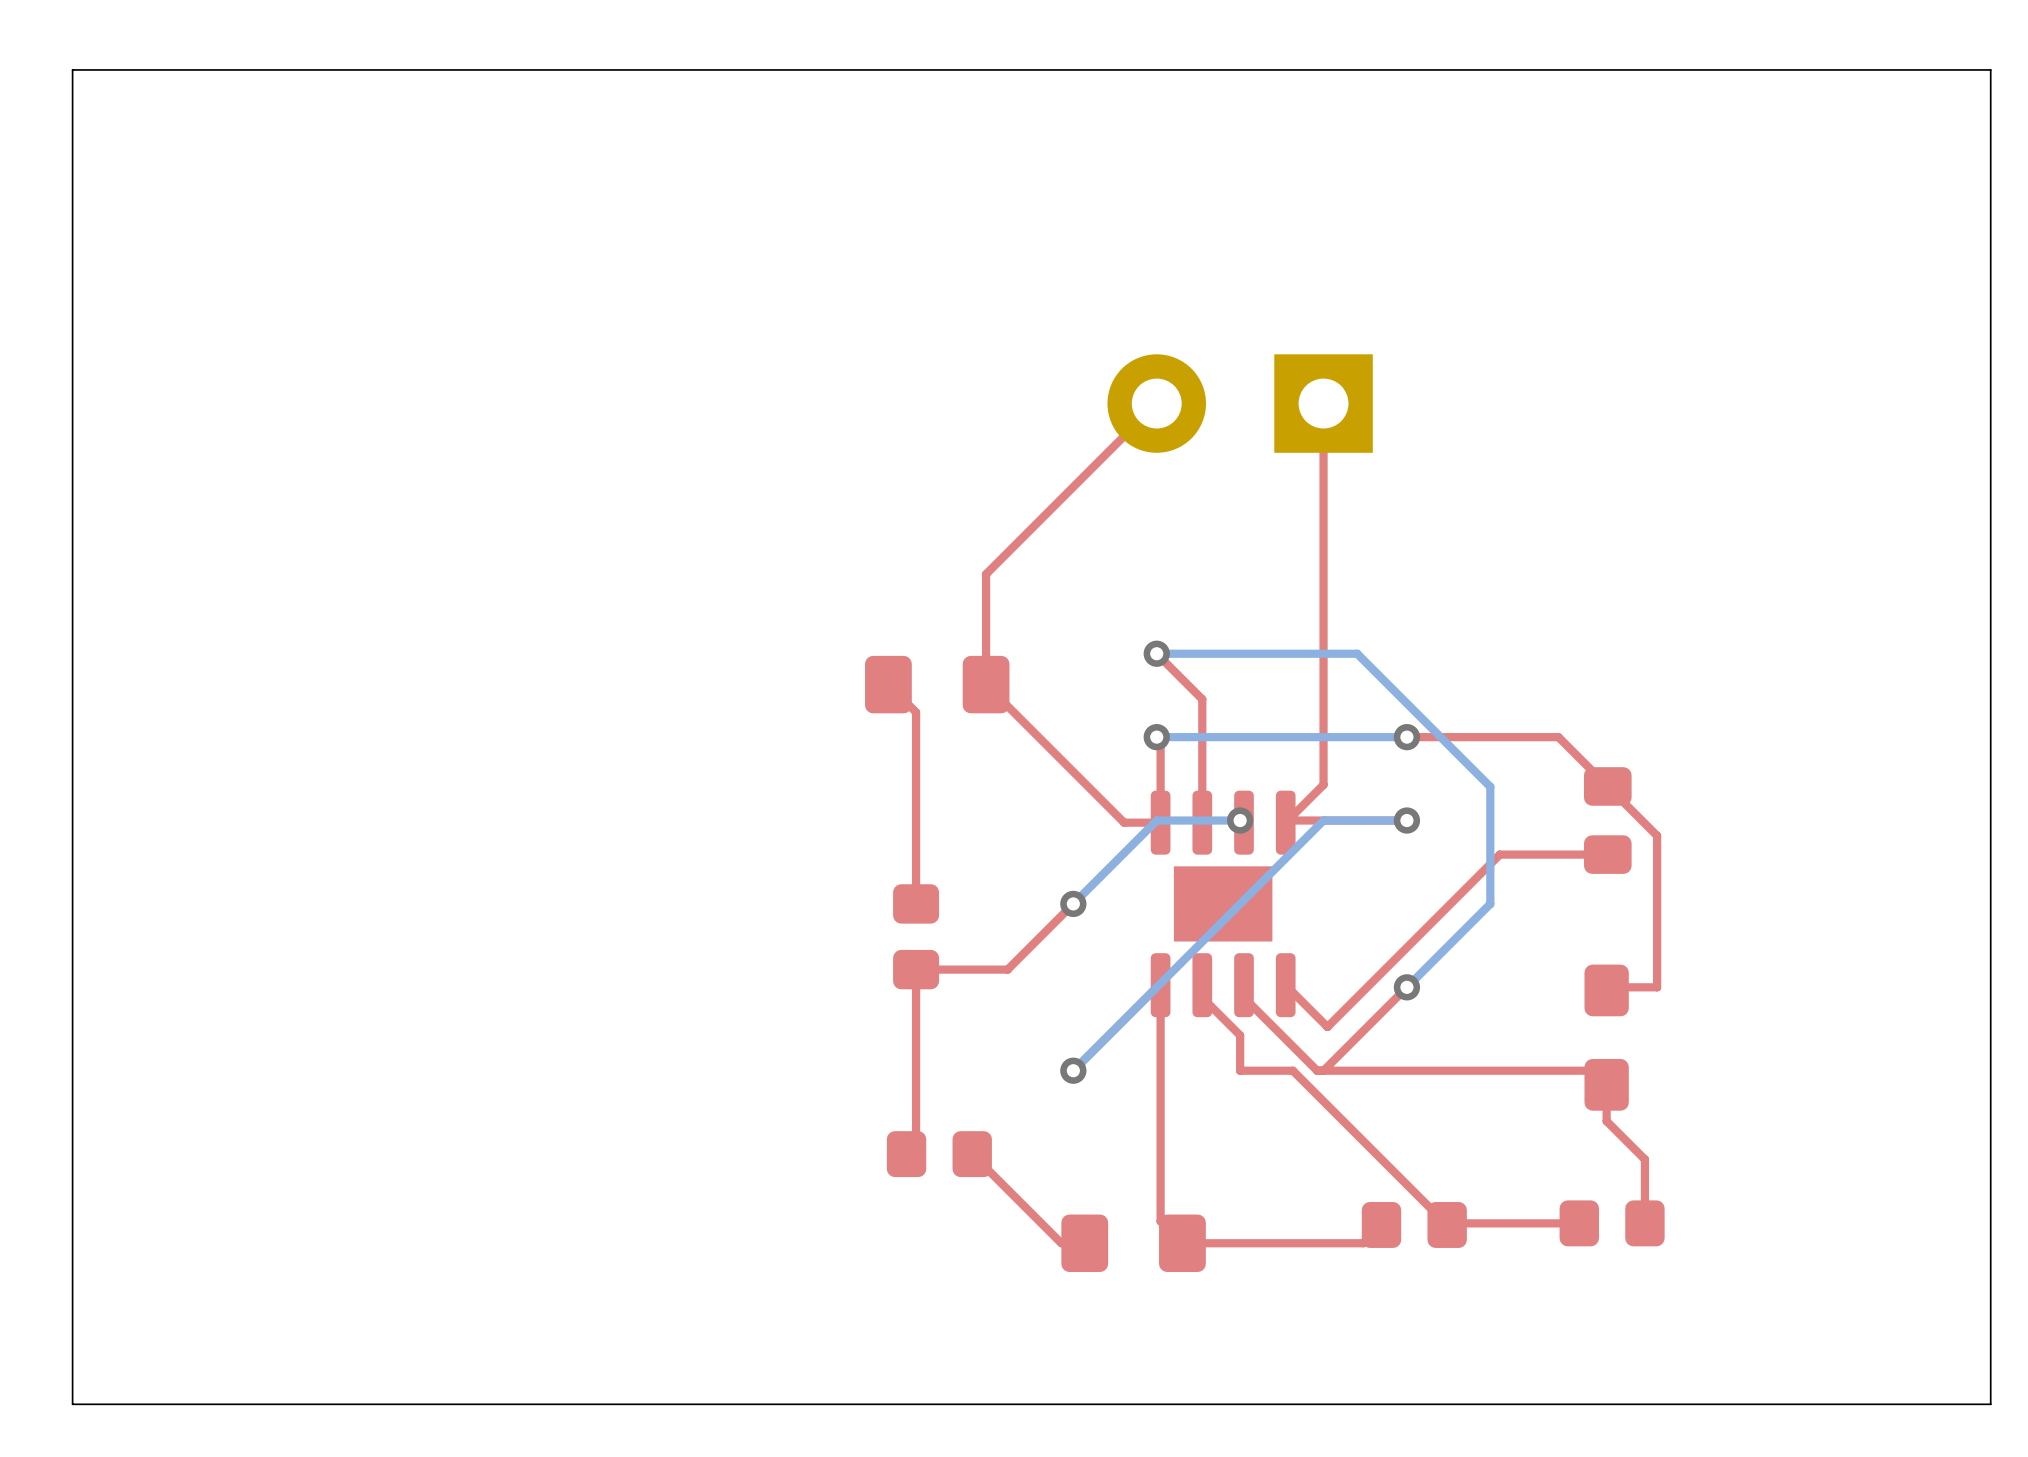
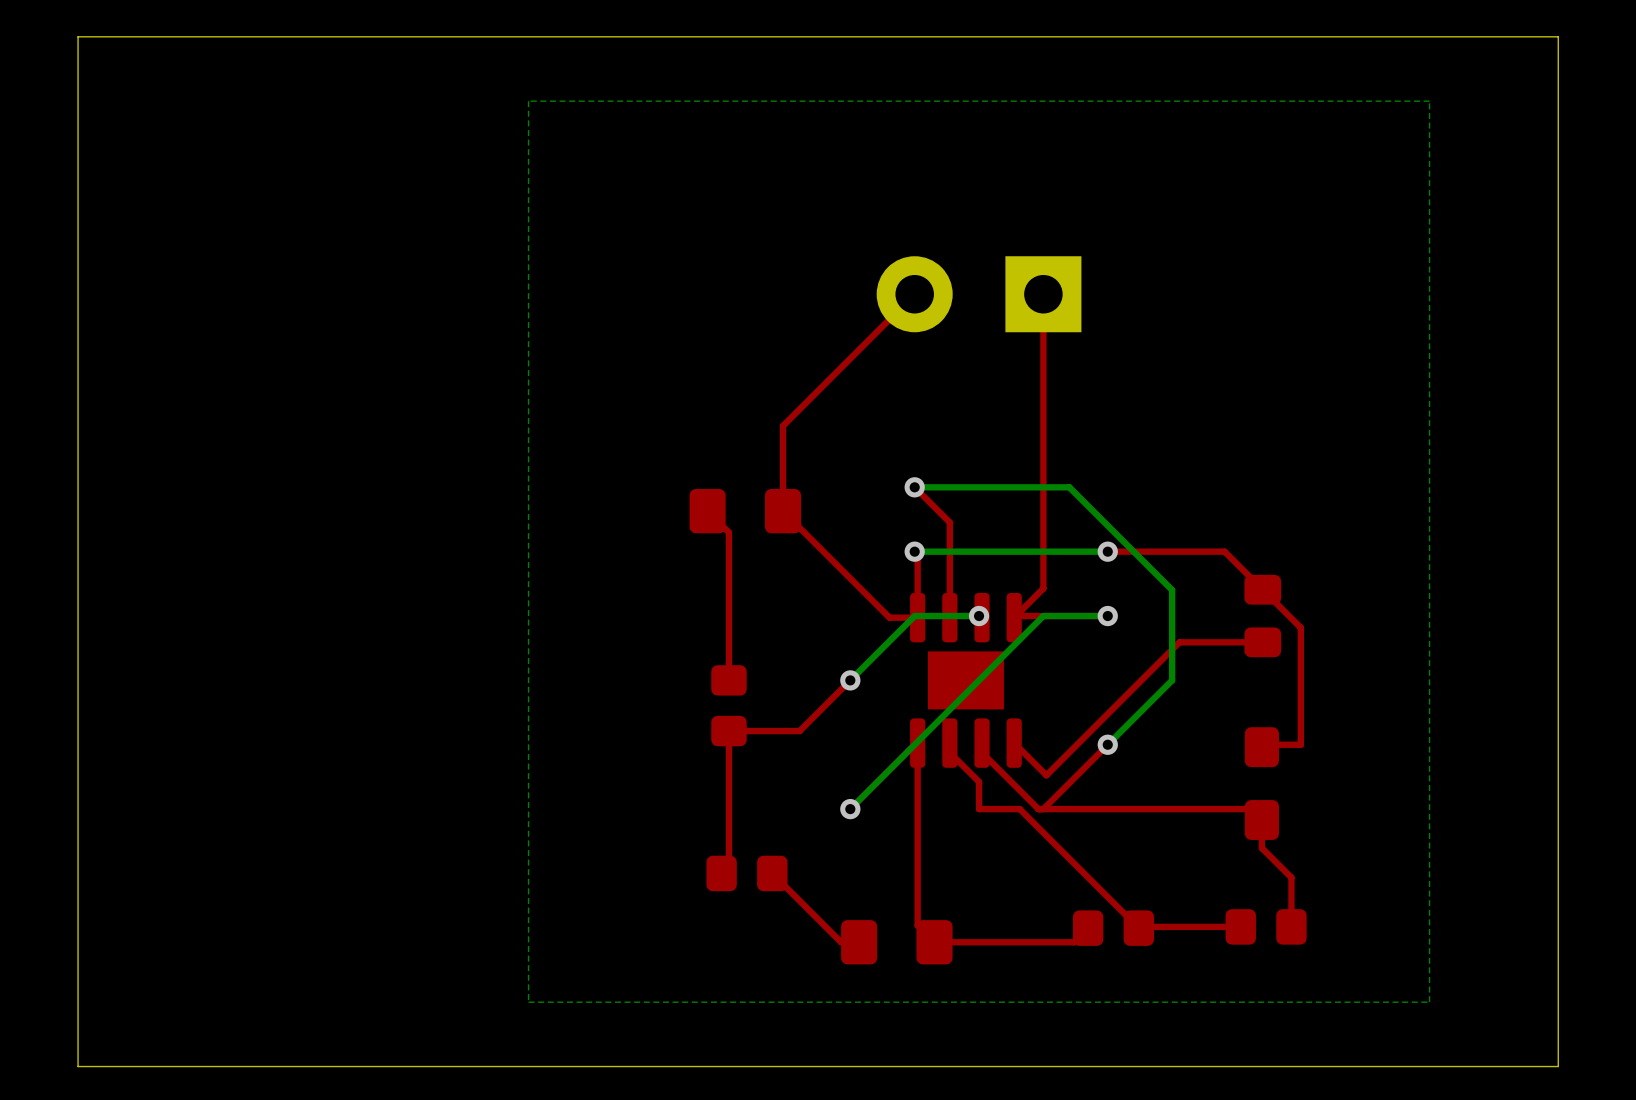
bottom zone outline: none -> (1429, 101) (1429, 1002) (528, 1002) (528, 101) (1429, 101)

